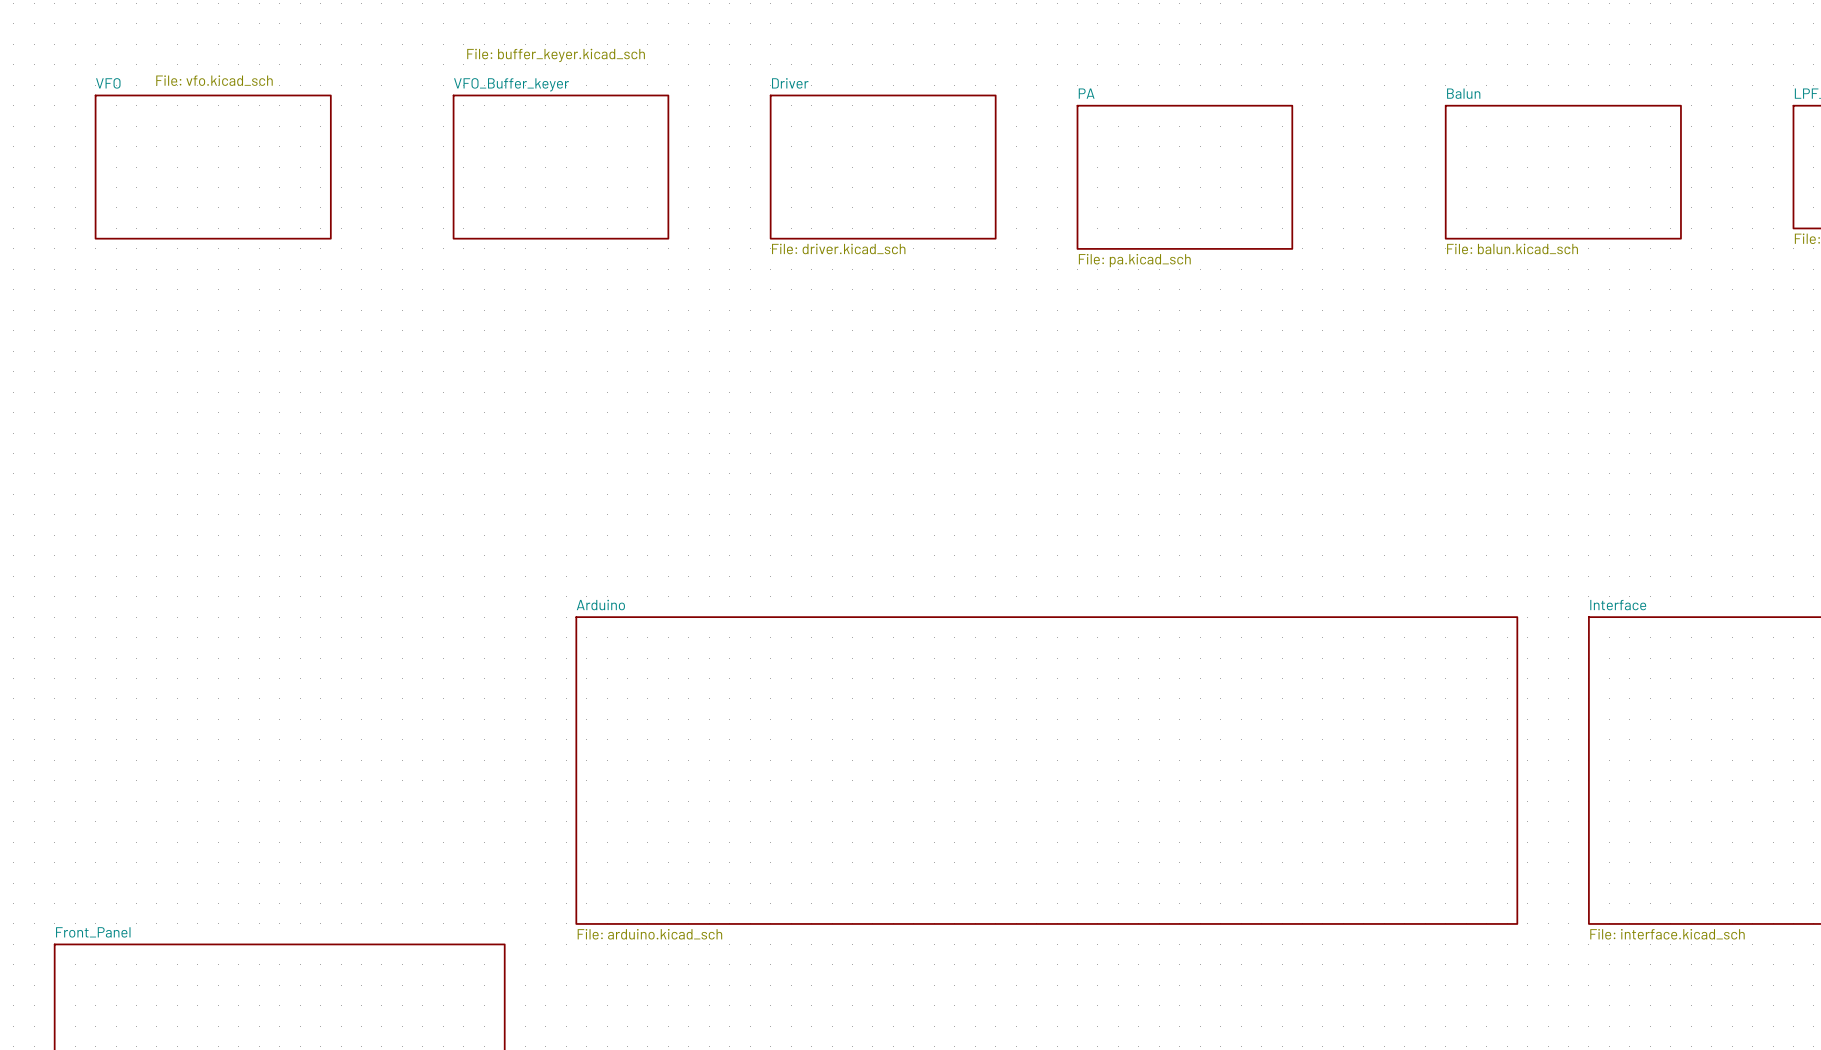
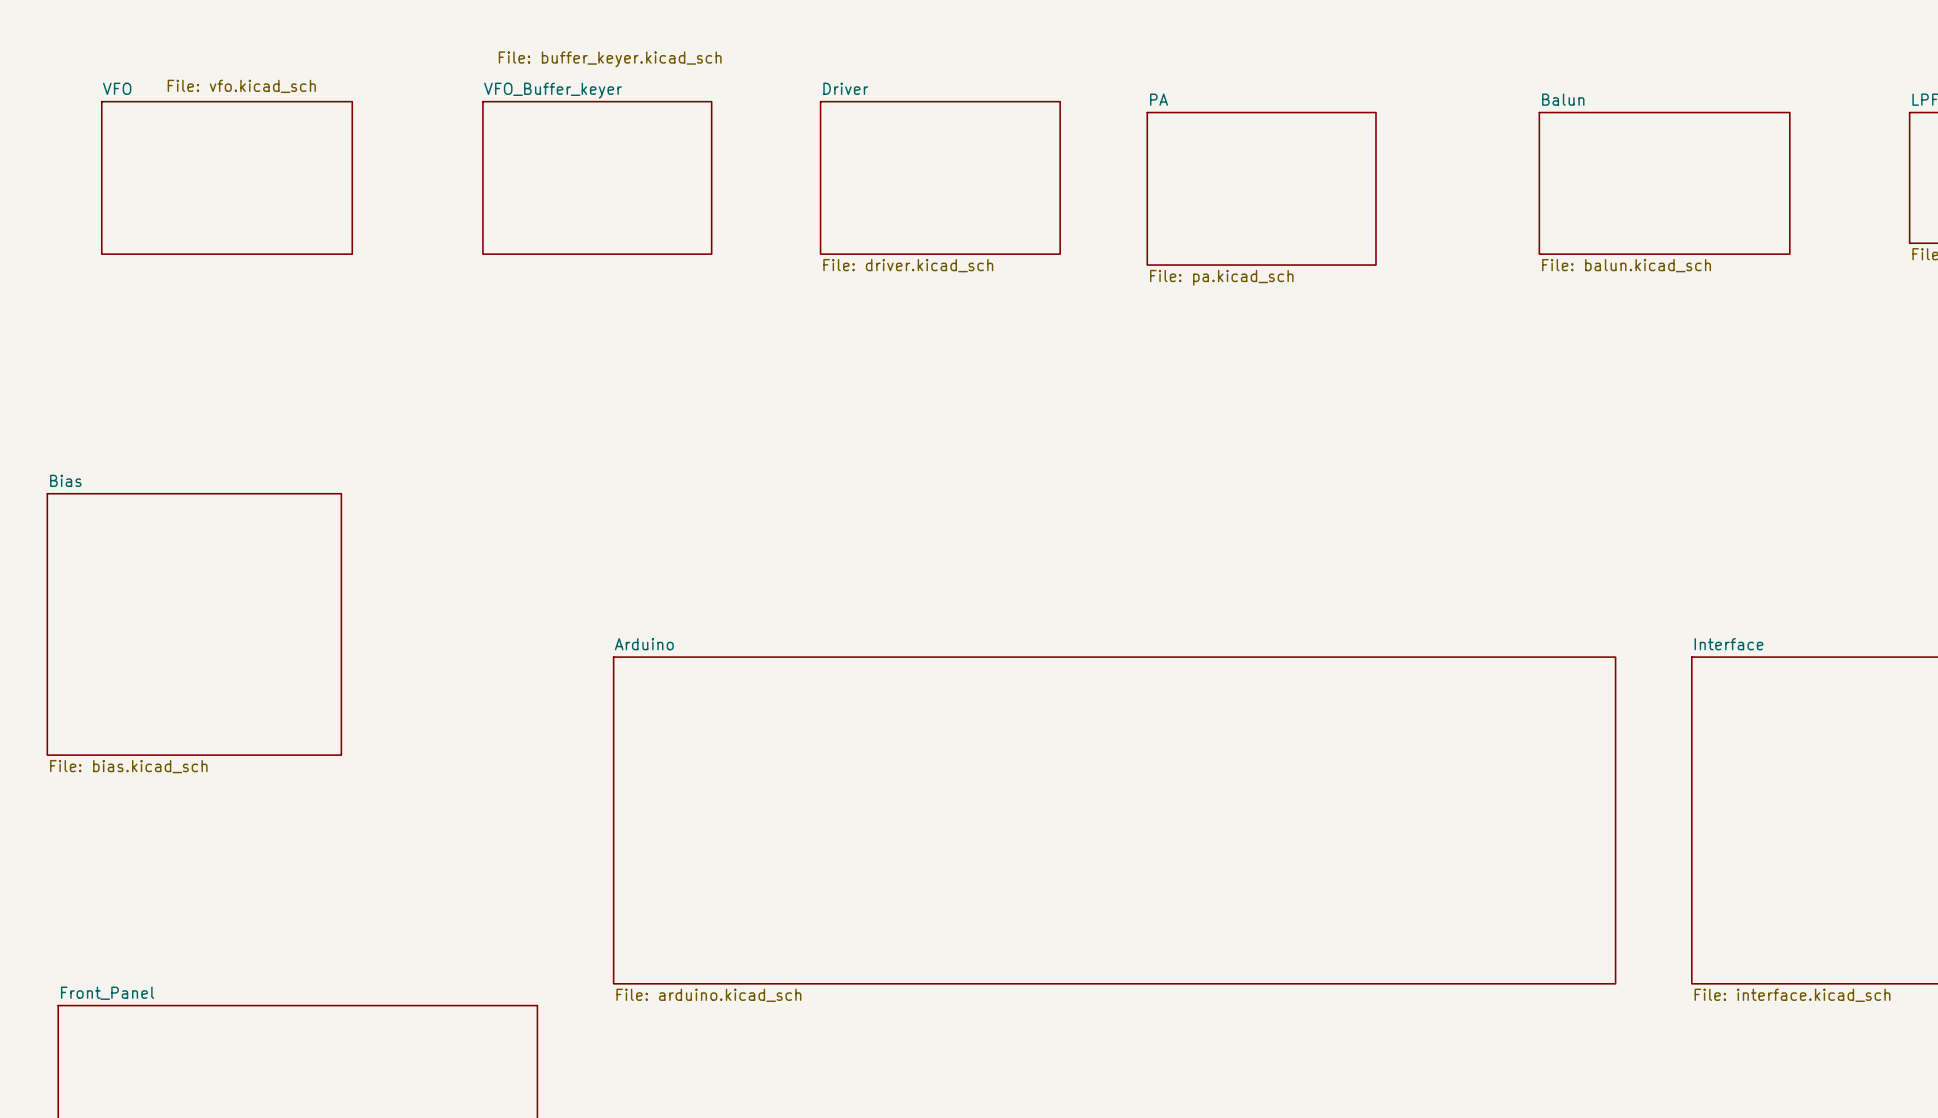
sheet Bias: none -> File: bias.kicad_sch (194, 624)

